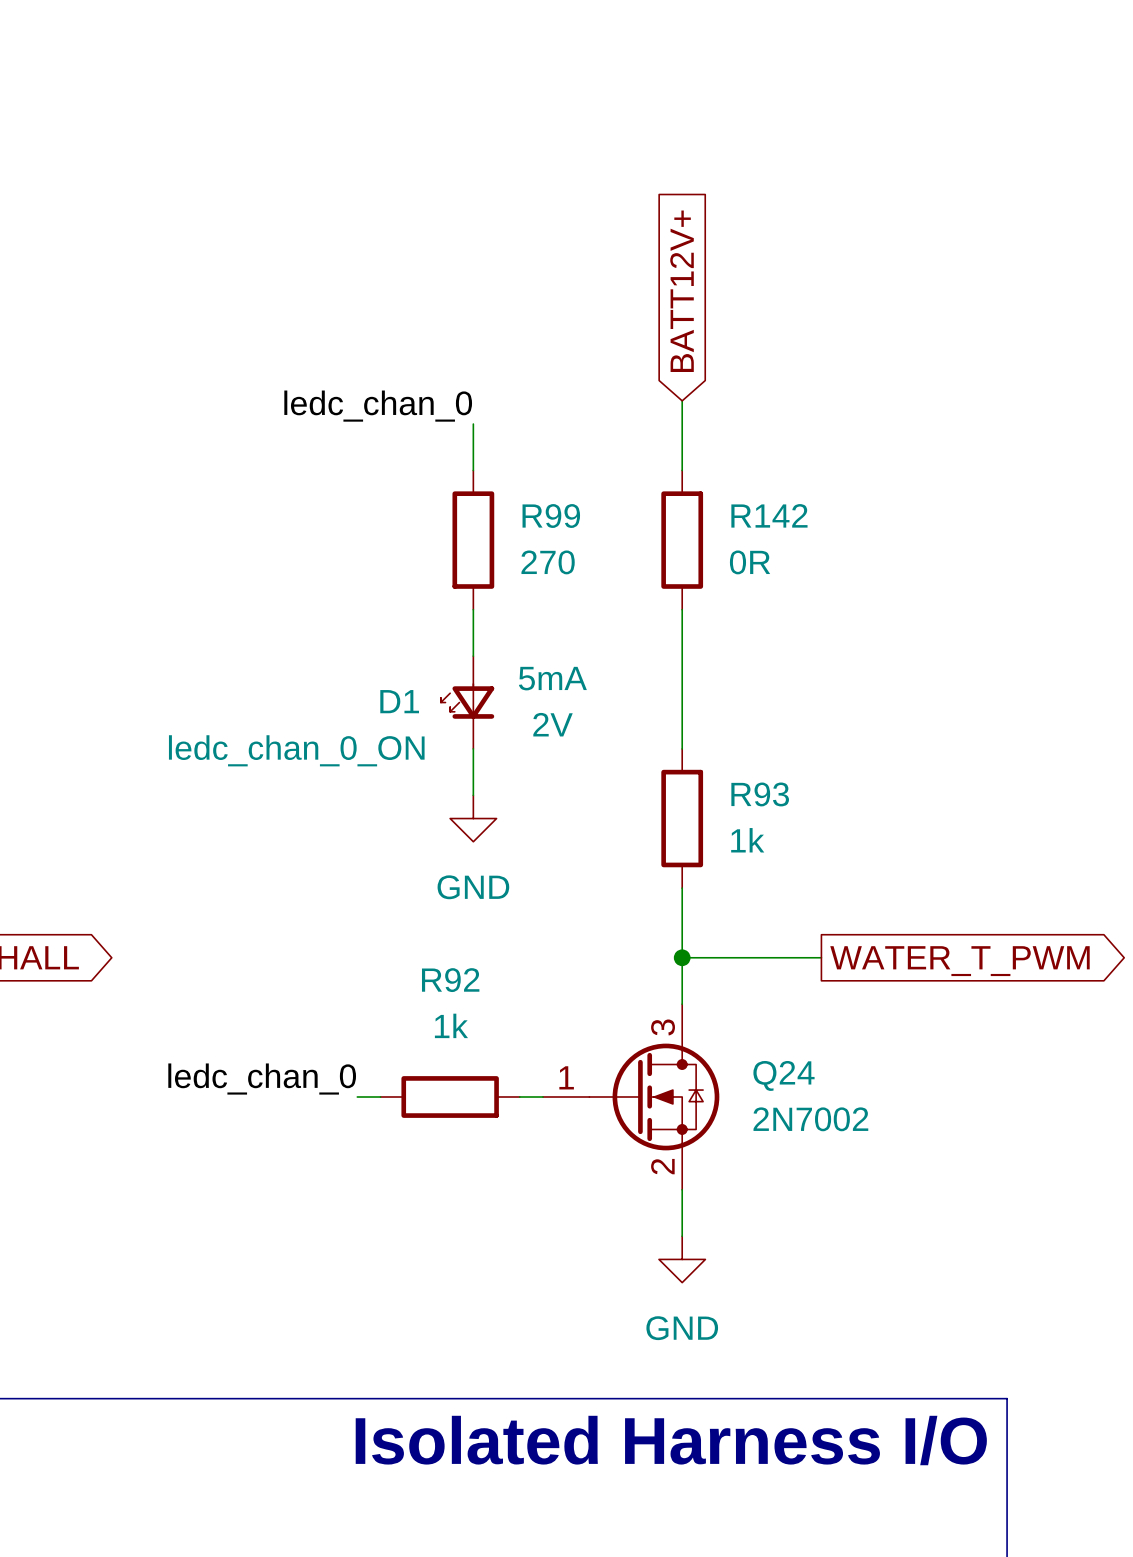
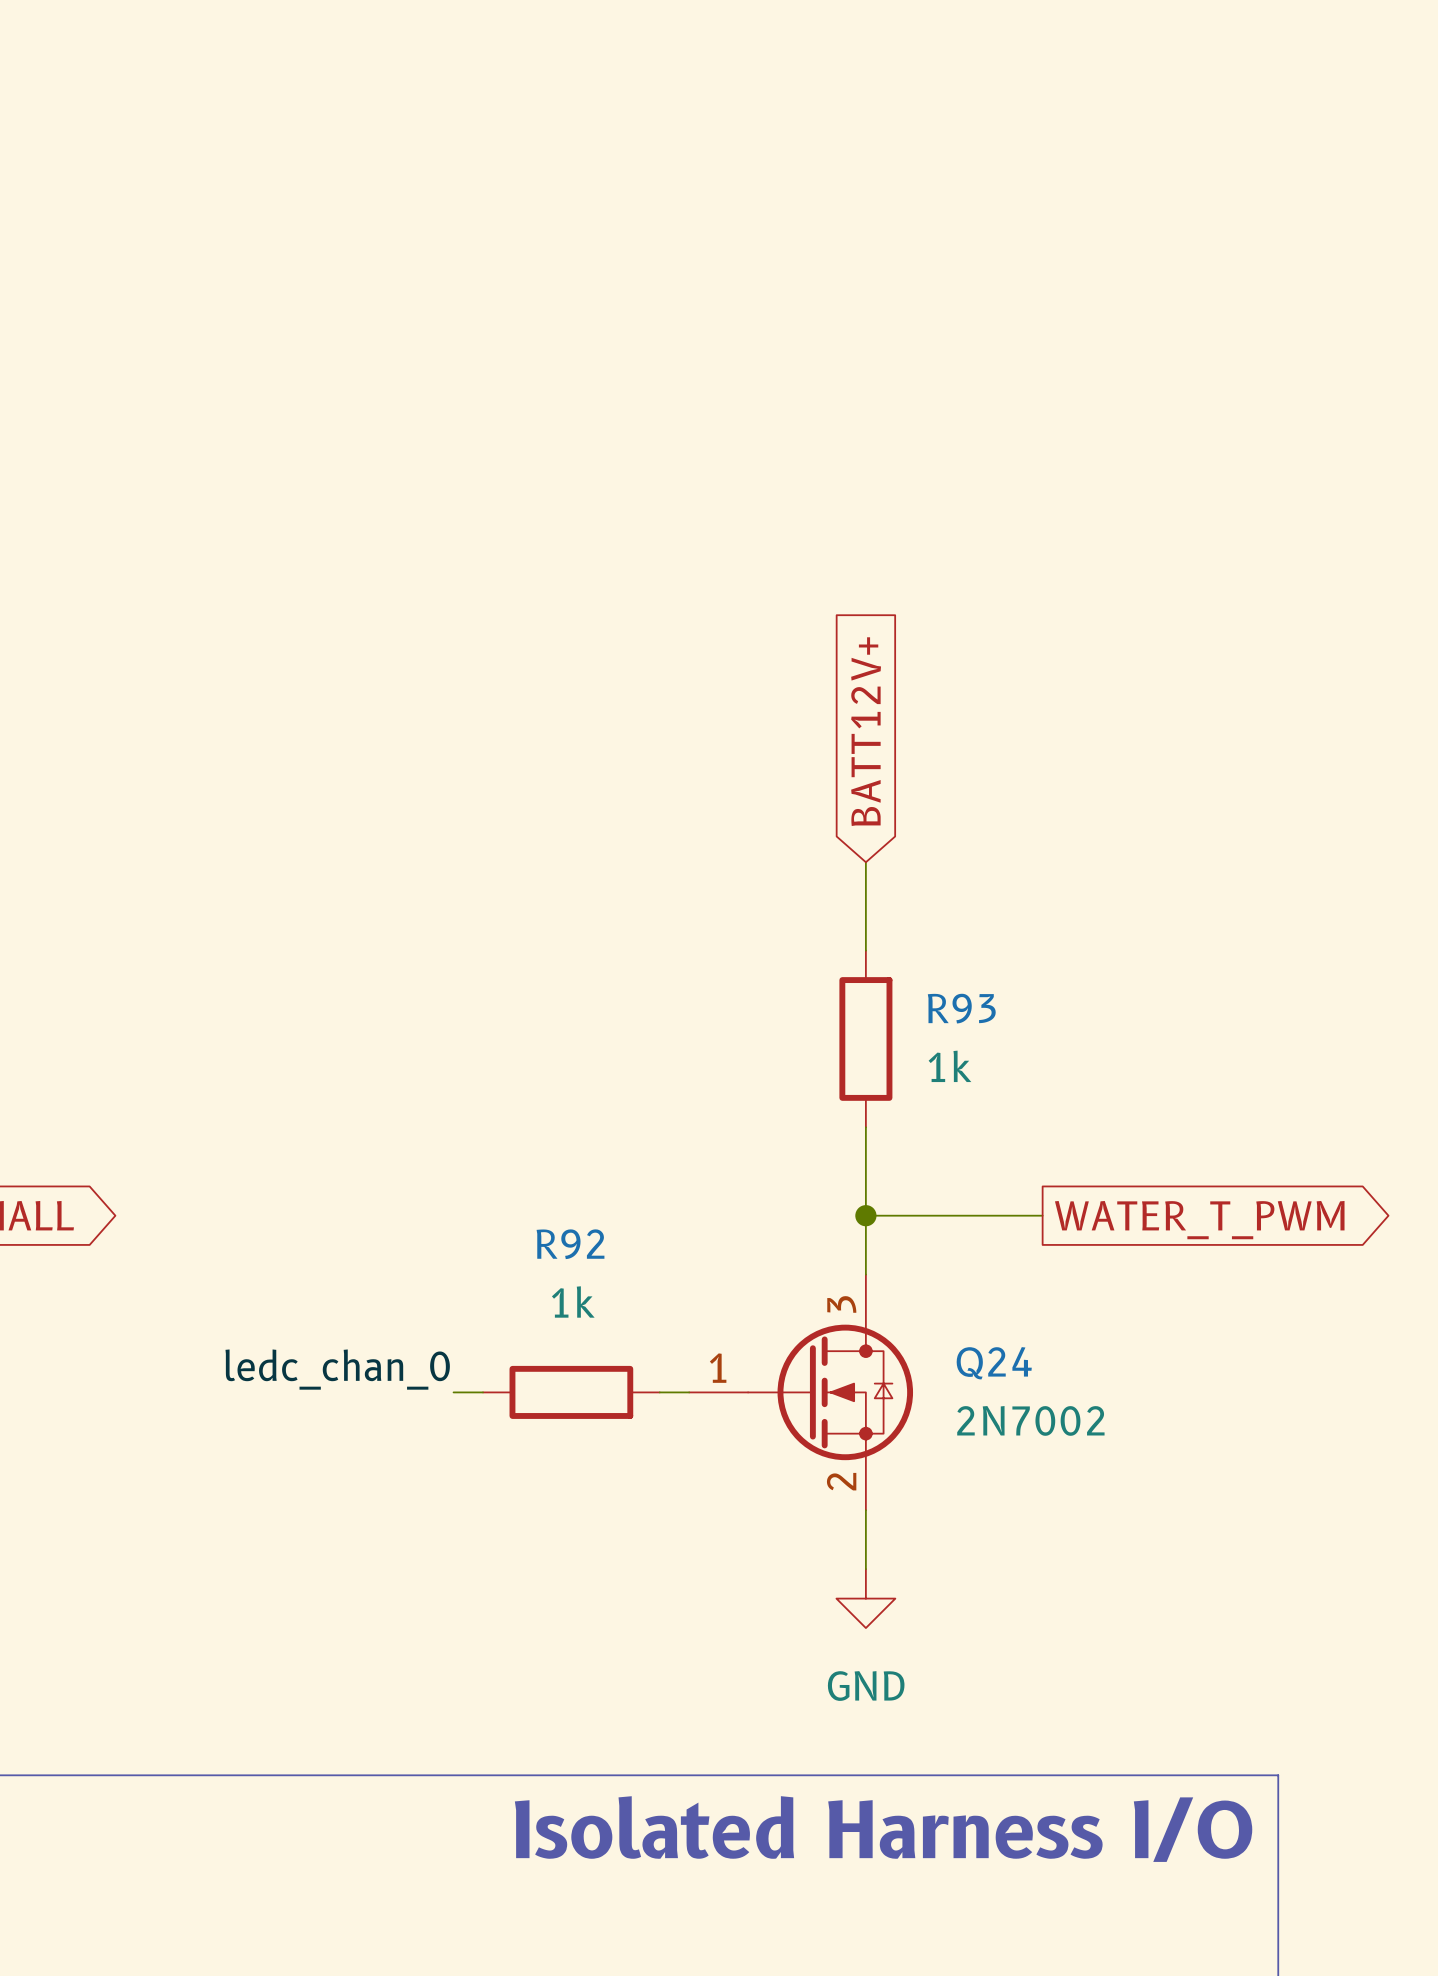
global label position: BATT12V+ (682, 291) -> BATT12V+ (866, 731)
wire: (682, 400) (682, 470) -> none
label: ledc_chan_0 (378, 406) -> none
wire: (473, 424) (473, 470) -> none
R99: 270 (473, 540) -> none
R142: 0R (682, 540) -> none
wire: (473, 609) (473, 656) -> none
wire: (682, 609) (682, 679) -> none
D1: ledc_chan_0_ON (467, 702) -> none
wire: (473, 748) (473, 795) -> none
power symbol: GND (473, 818) -> none

